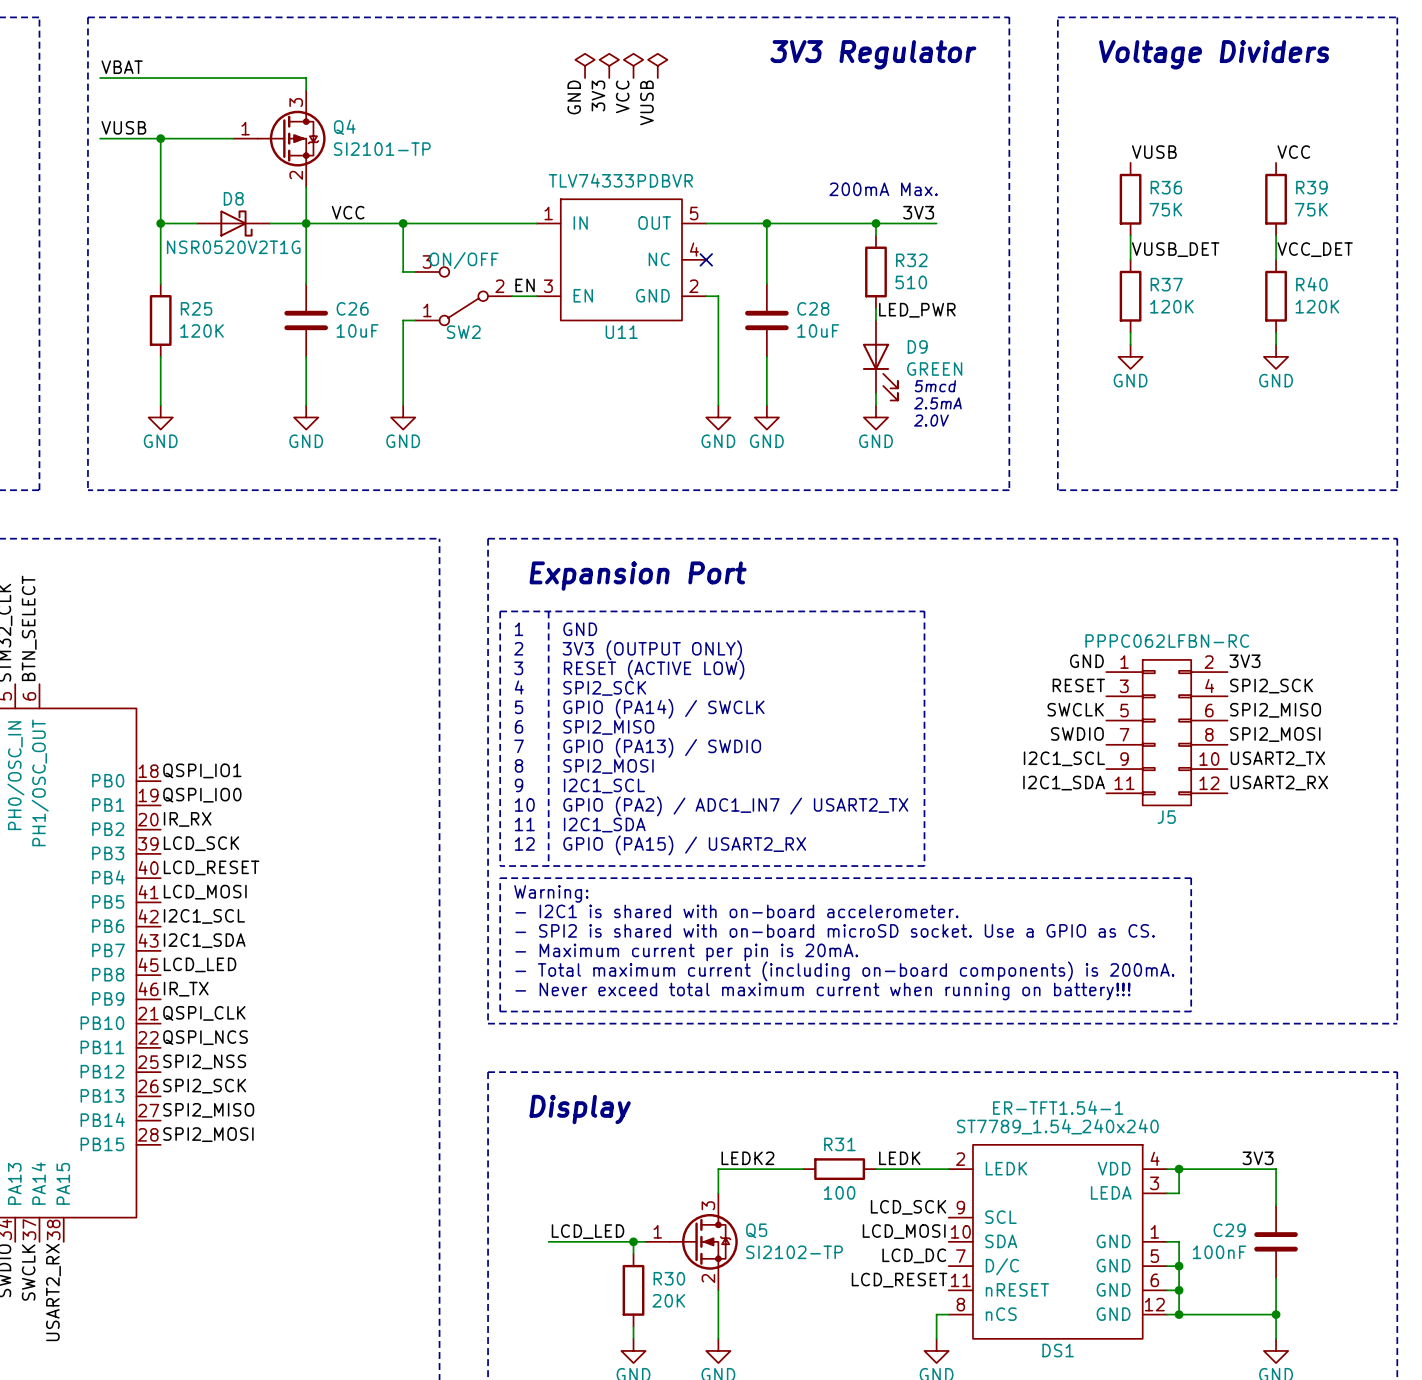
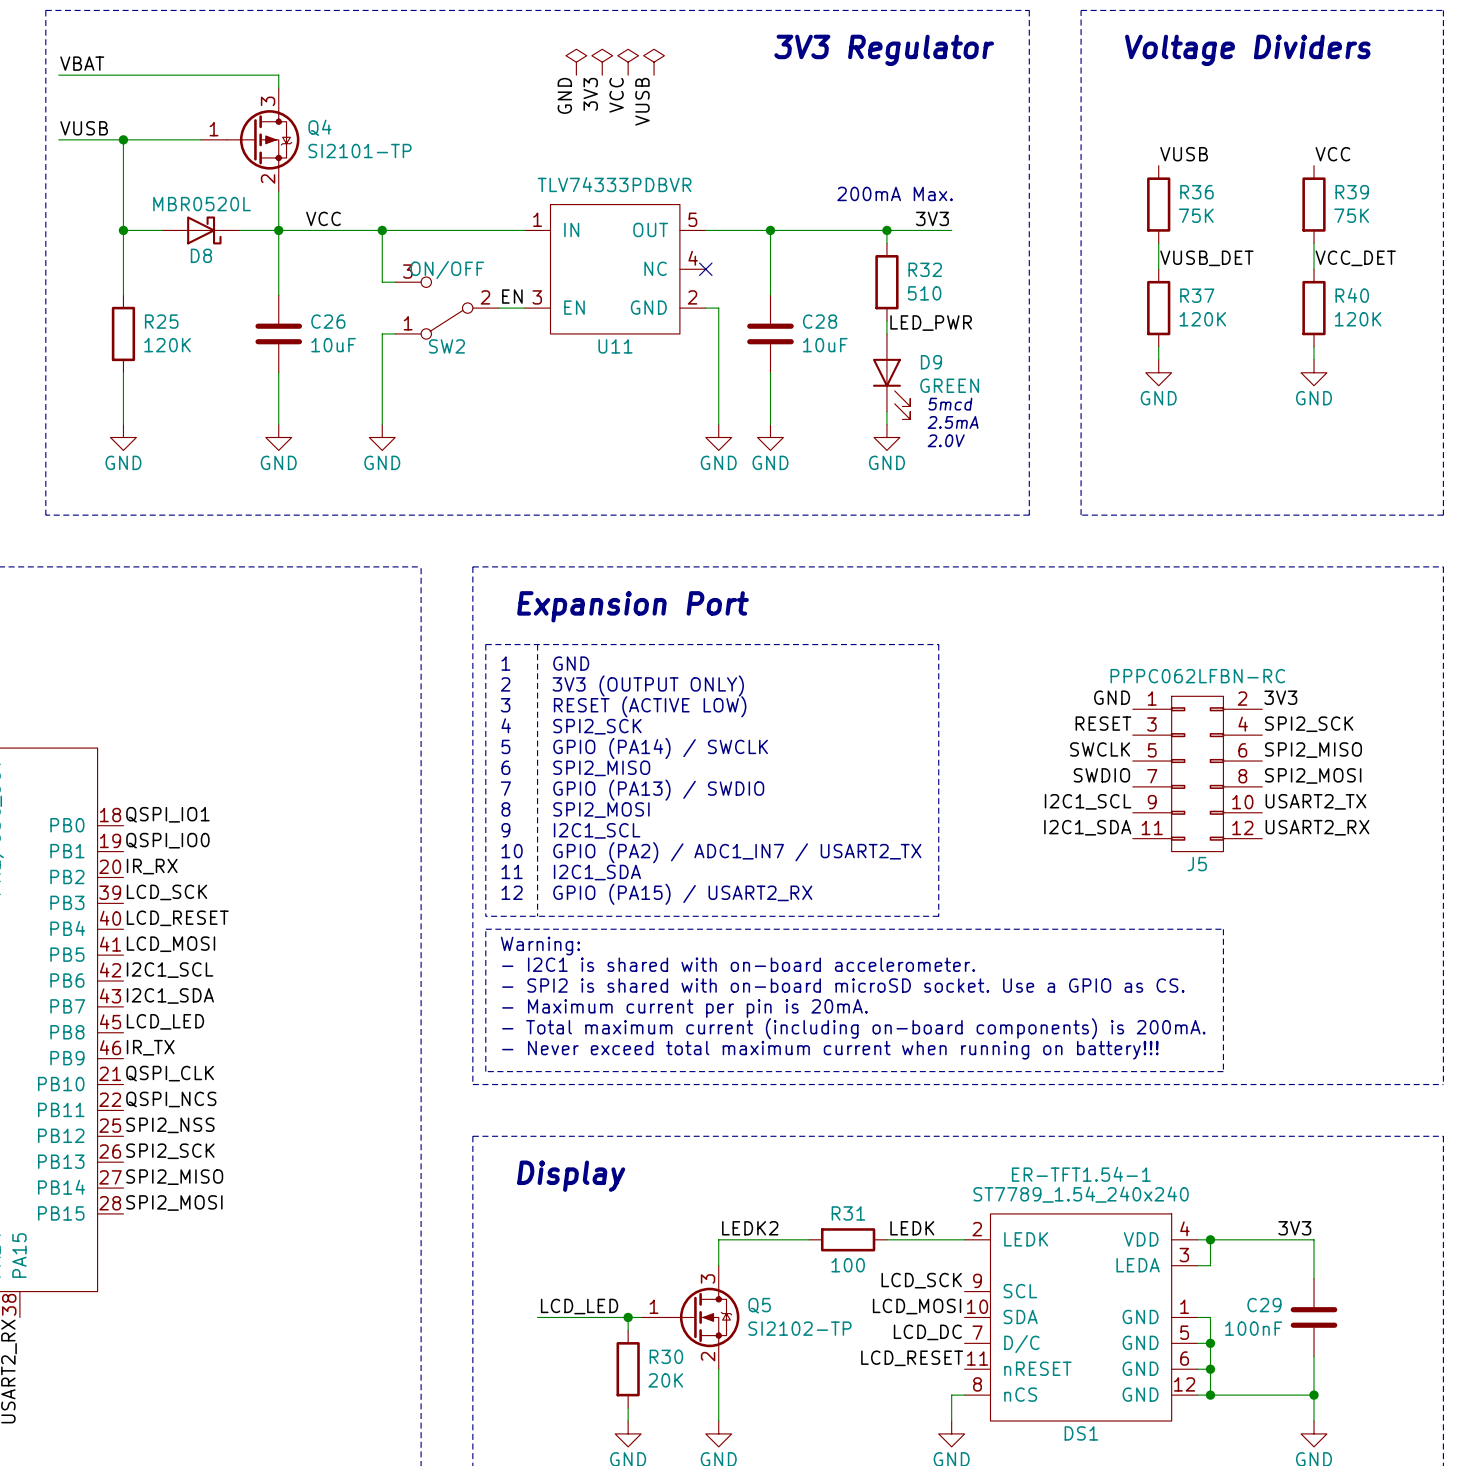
D8 name position: D8 (233, 198) -> D8 (201, 255)
D8 value: NSR0520V2T1G (233, 247) -> MBR0520L (202, 204)

